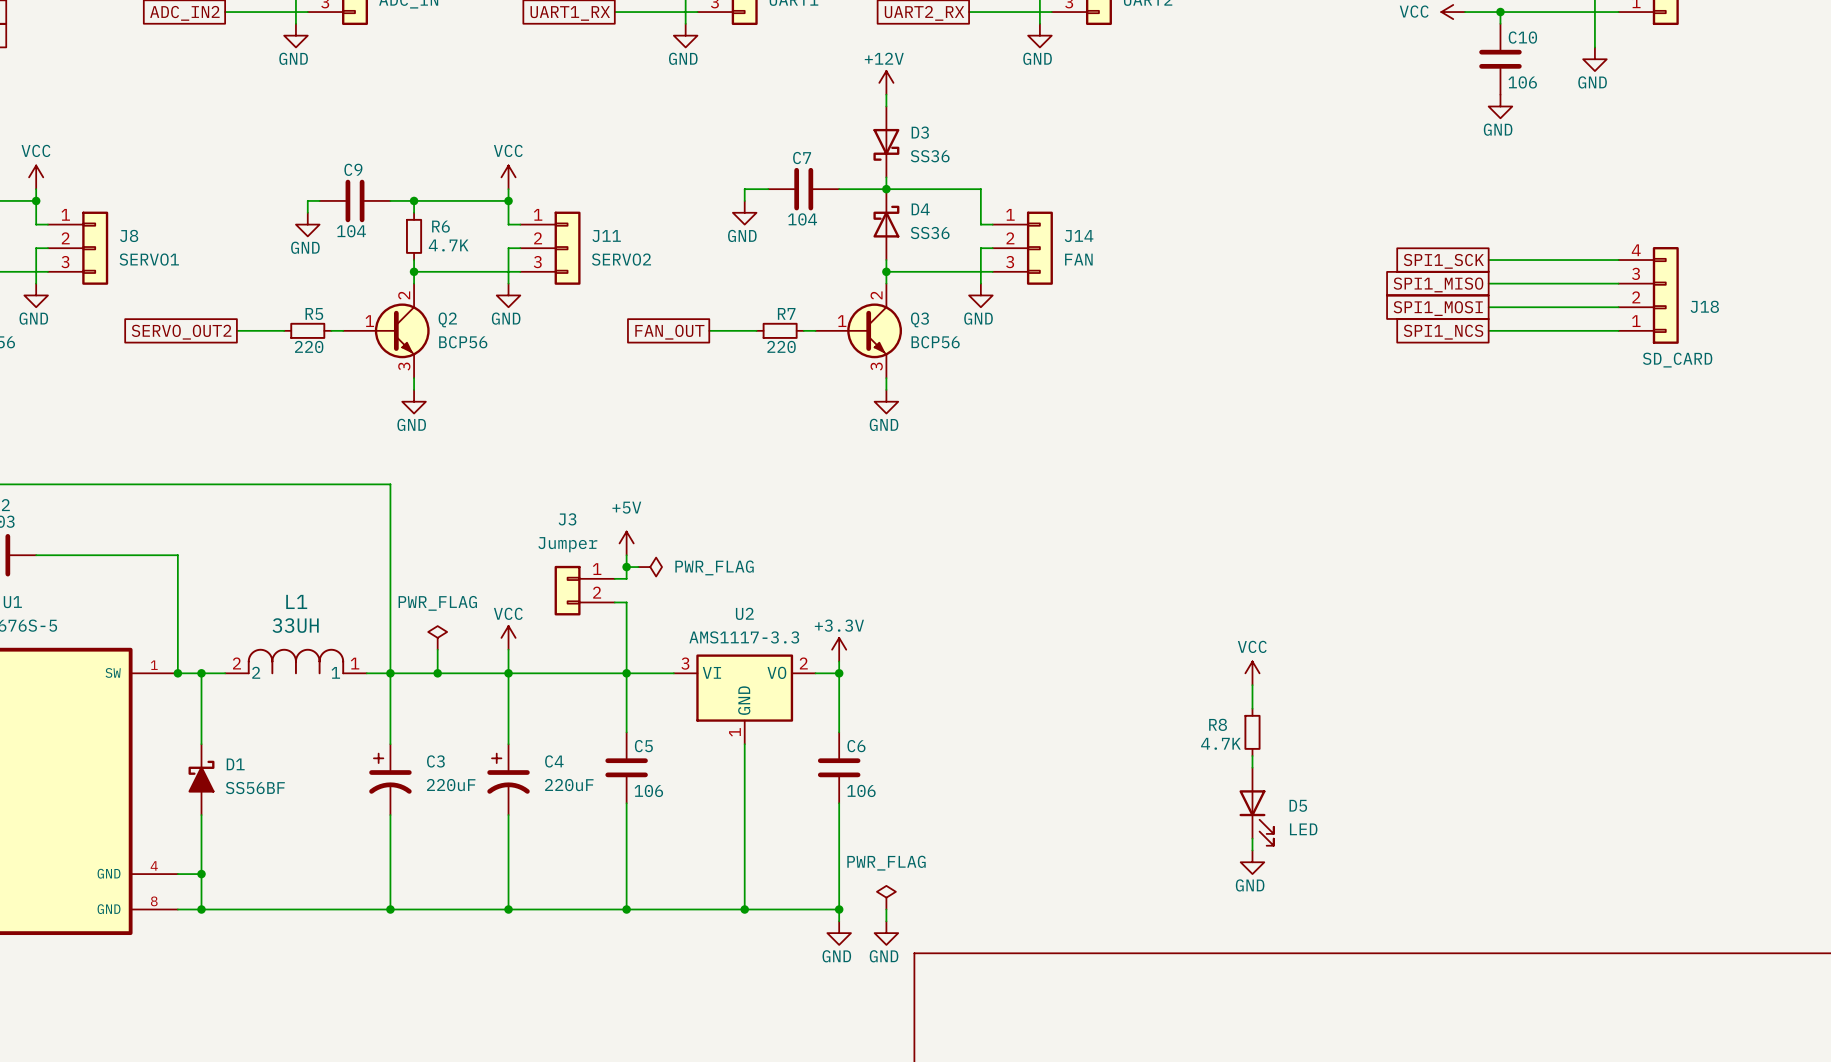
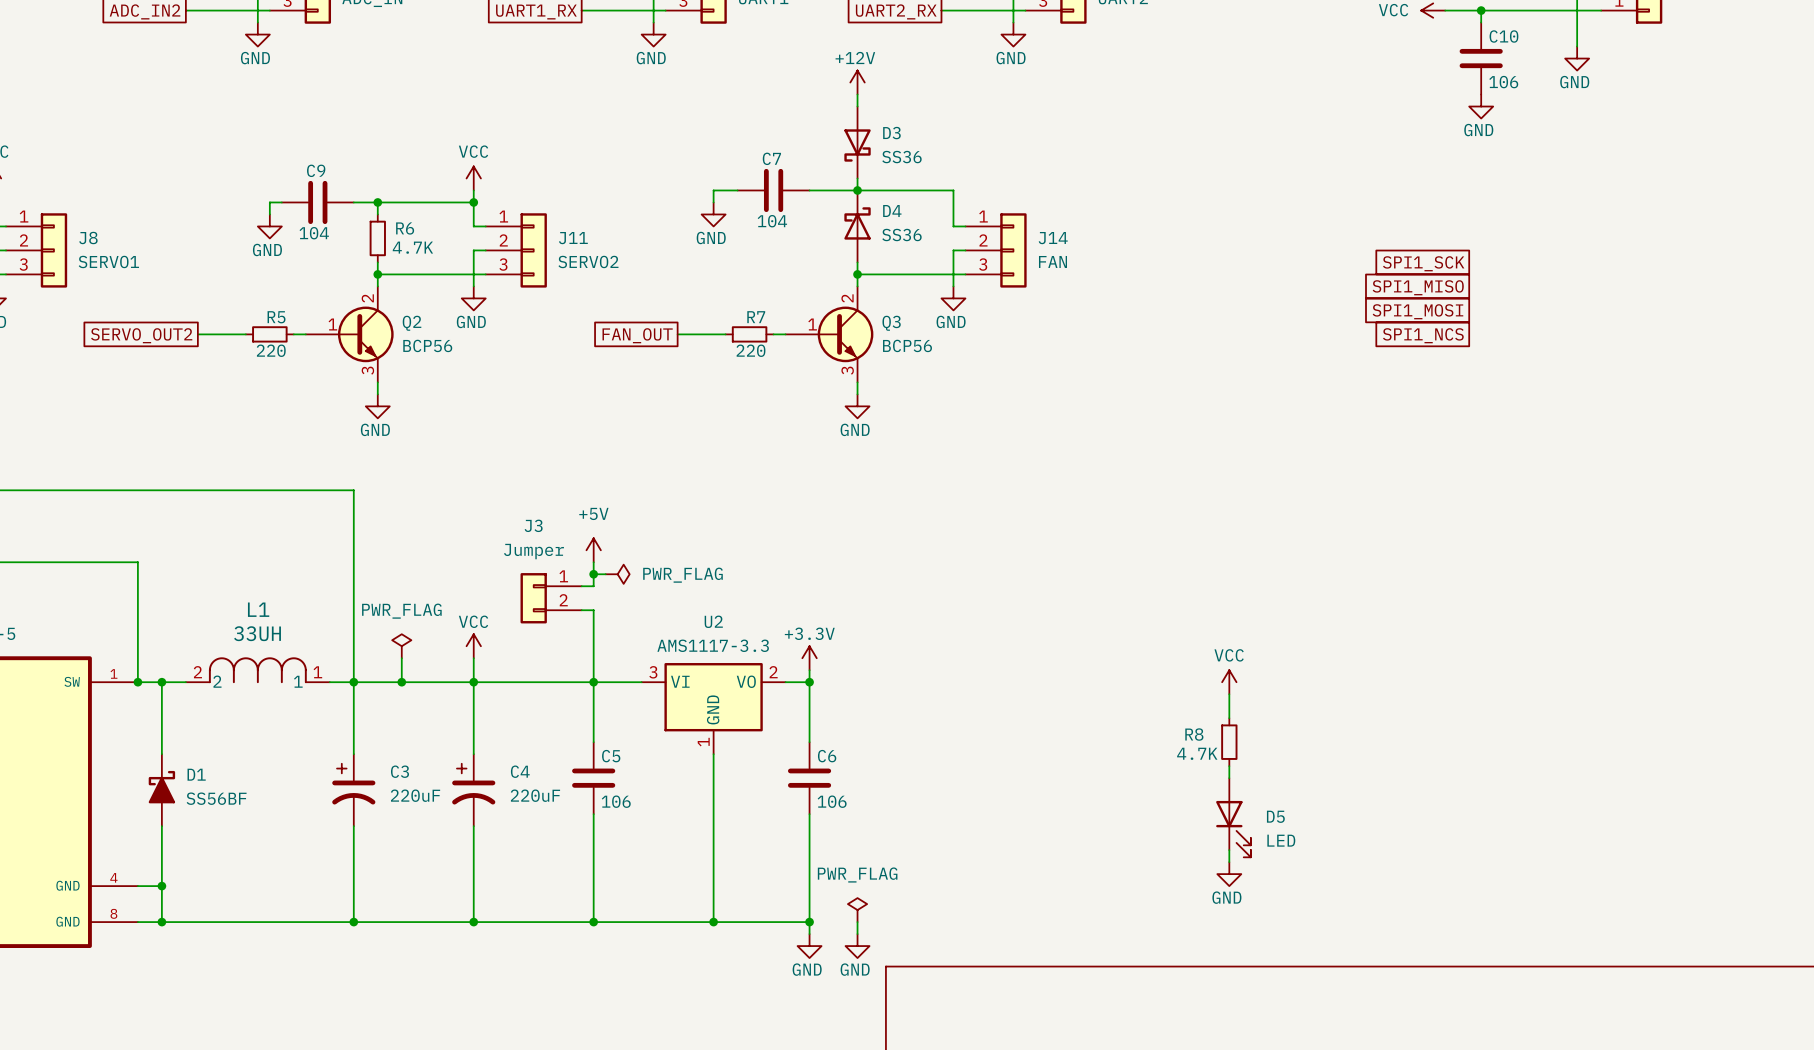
wire: (1488, 260) (1618, 260) -> none
wire: (1488, 283) (1618, 283) -> none
J18: SD_CARD (1648, 295) -> none
wire: (1488, 307) (1618, 307) -> none
wire: (1488, 330) (1618, 330) -> none

